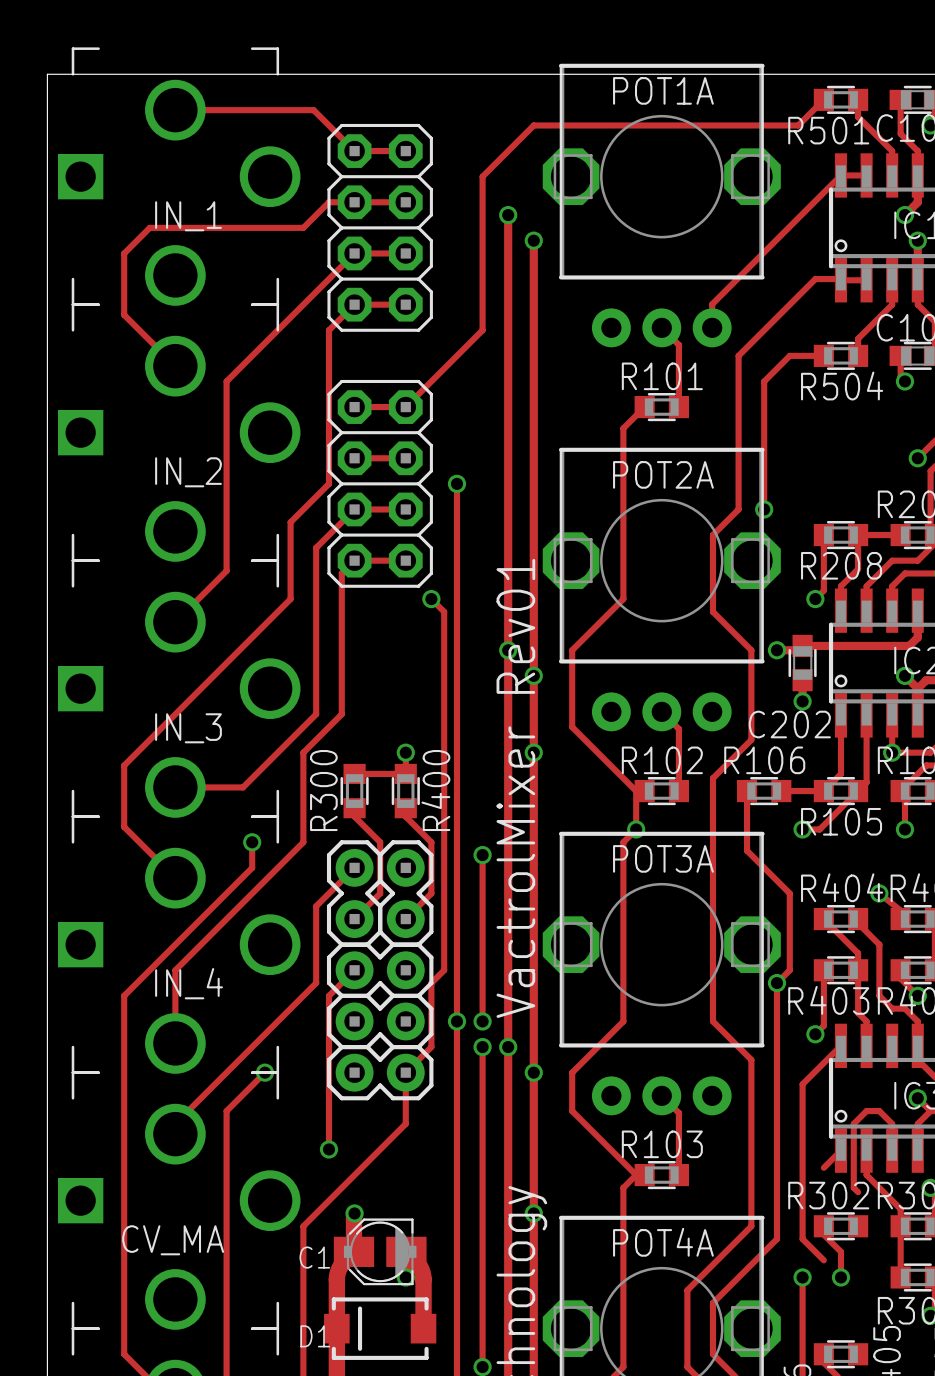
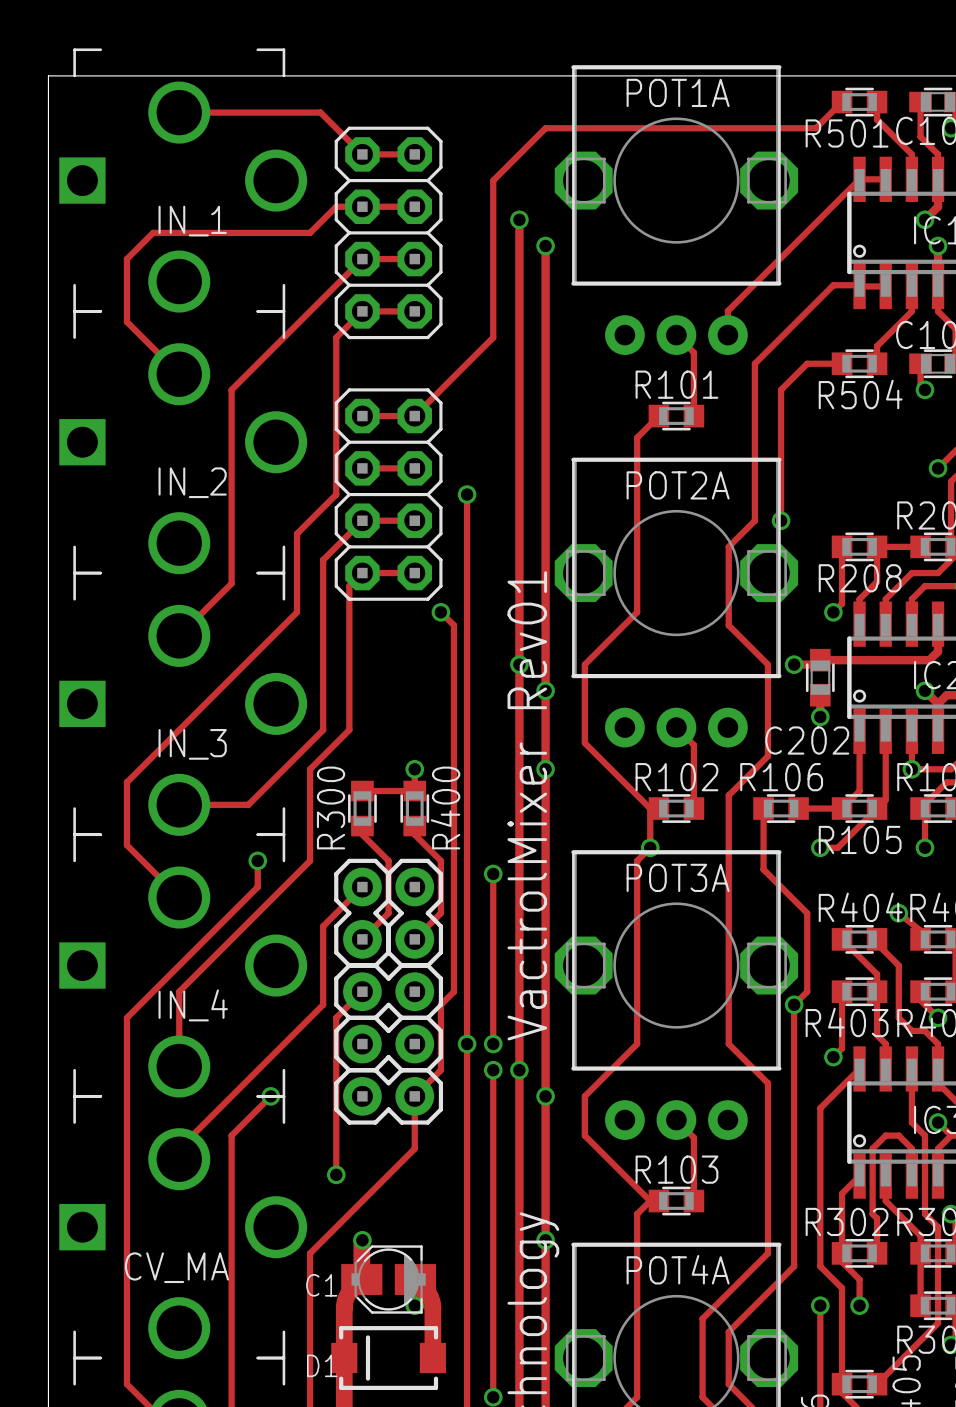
track: none -> (911, 1068) (911, 1122) (924, 1135) (924, 1214) (938, 1227) (938, 1323) (877, 1384)
track: none -> (842, 1193) (842, 1262)
track: none -> (877, 1218) (877, 1253)
track: none -> (842, 1288) (842, 1392)

